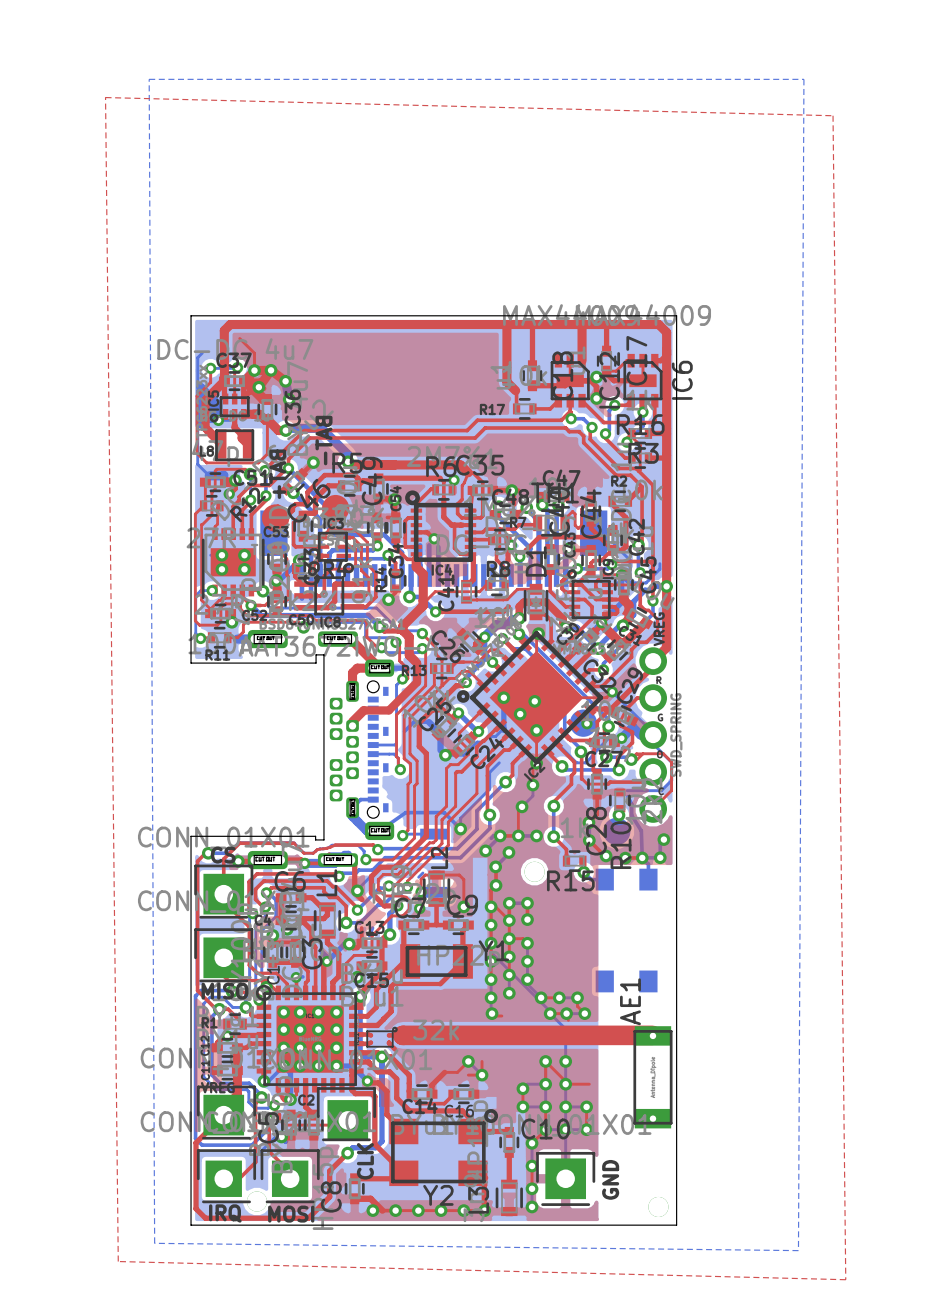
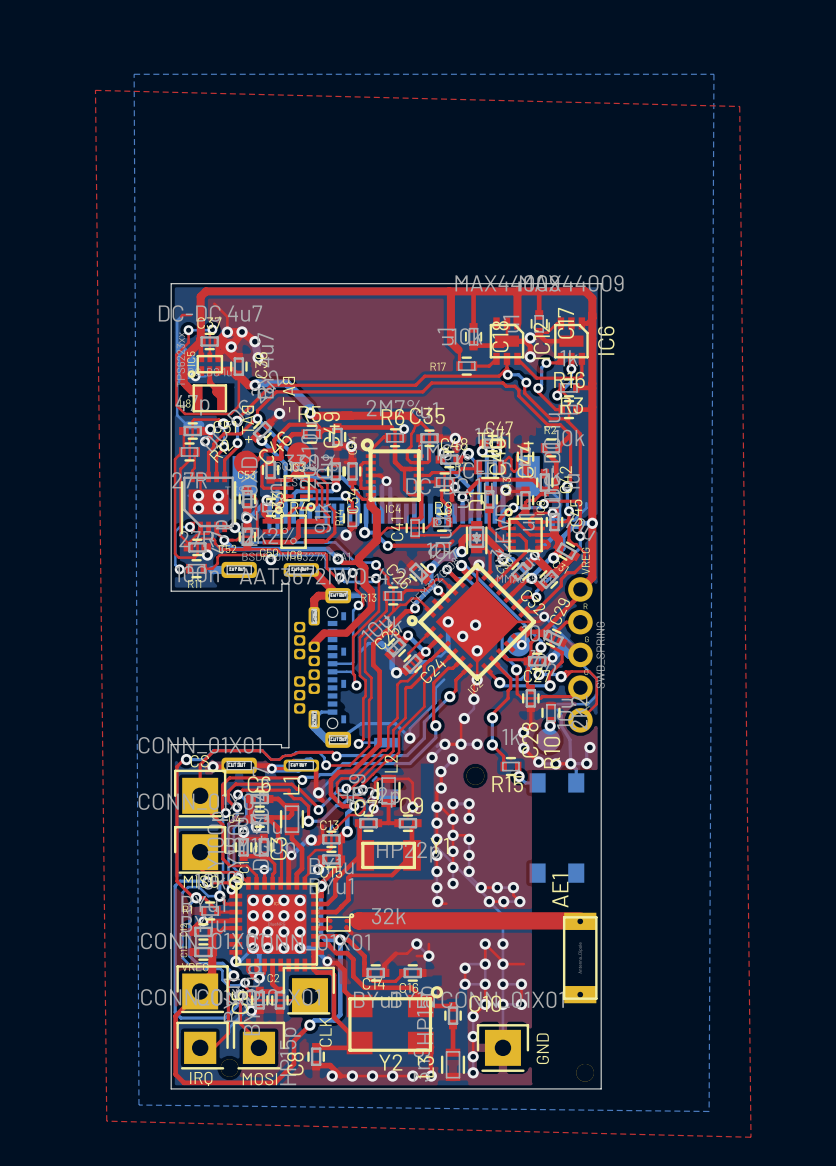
top track: none -> (191, 315) (181, 316)

